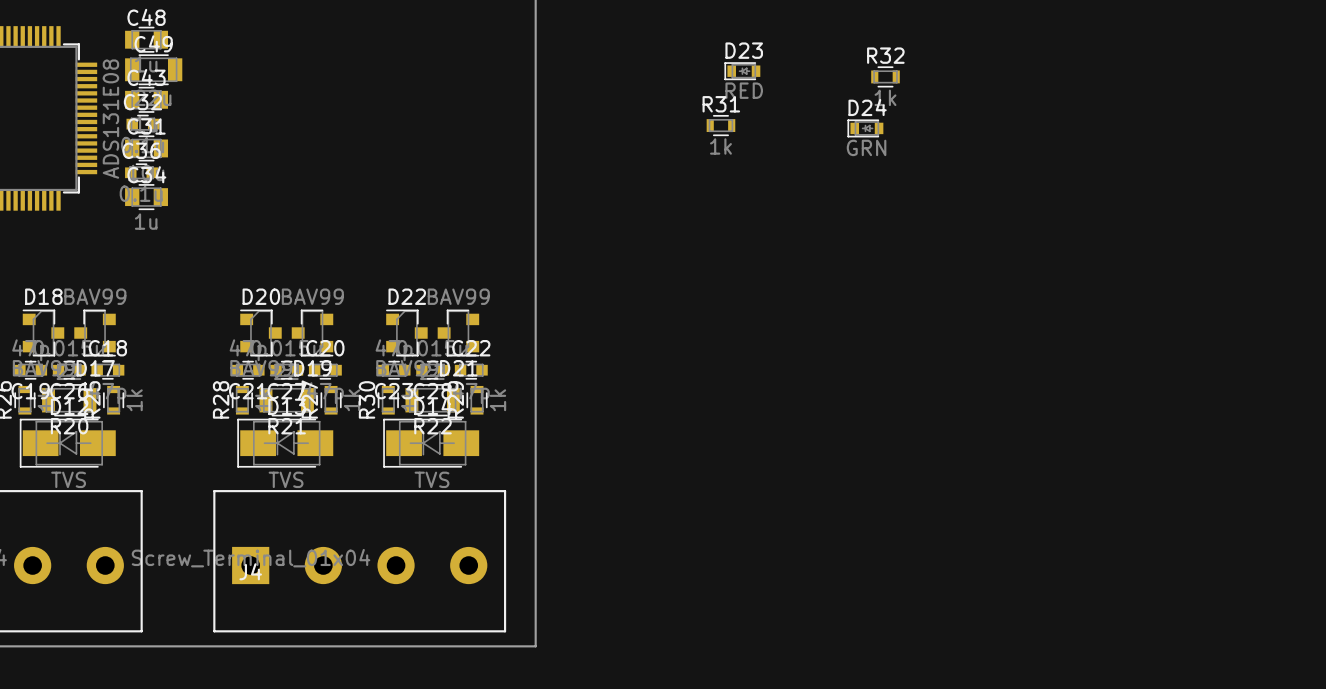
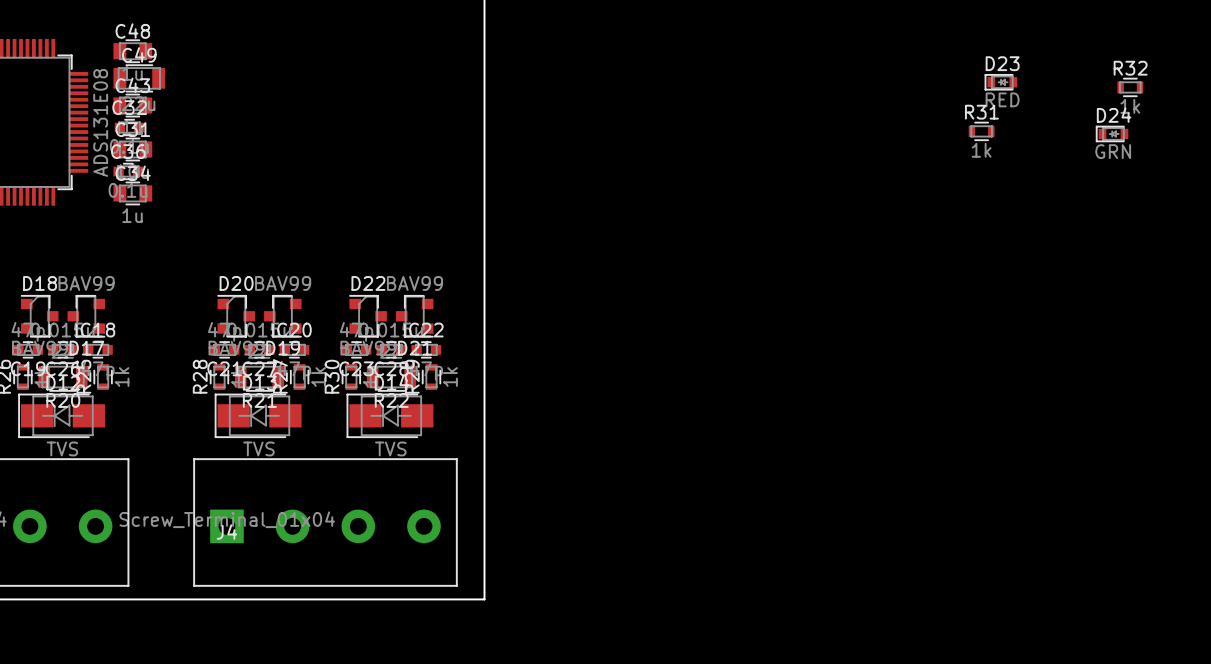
D23 position: (742, 71) -> (1000, 82)
R32 position: (885, 76) -> (1130, 87)
R31 position: (720, 125) -> (981, 131)
D24 position: (865, 128) -> (1112, 133)

